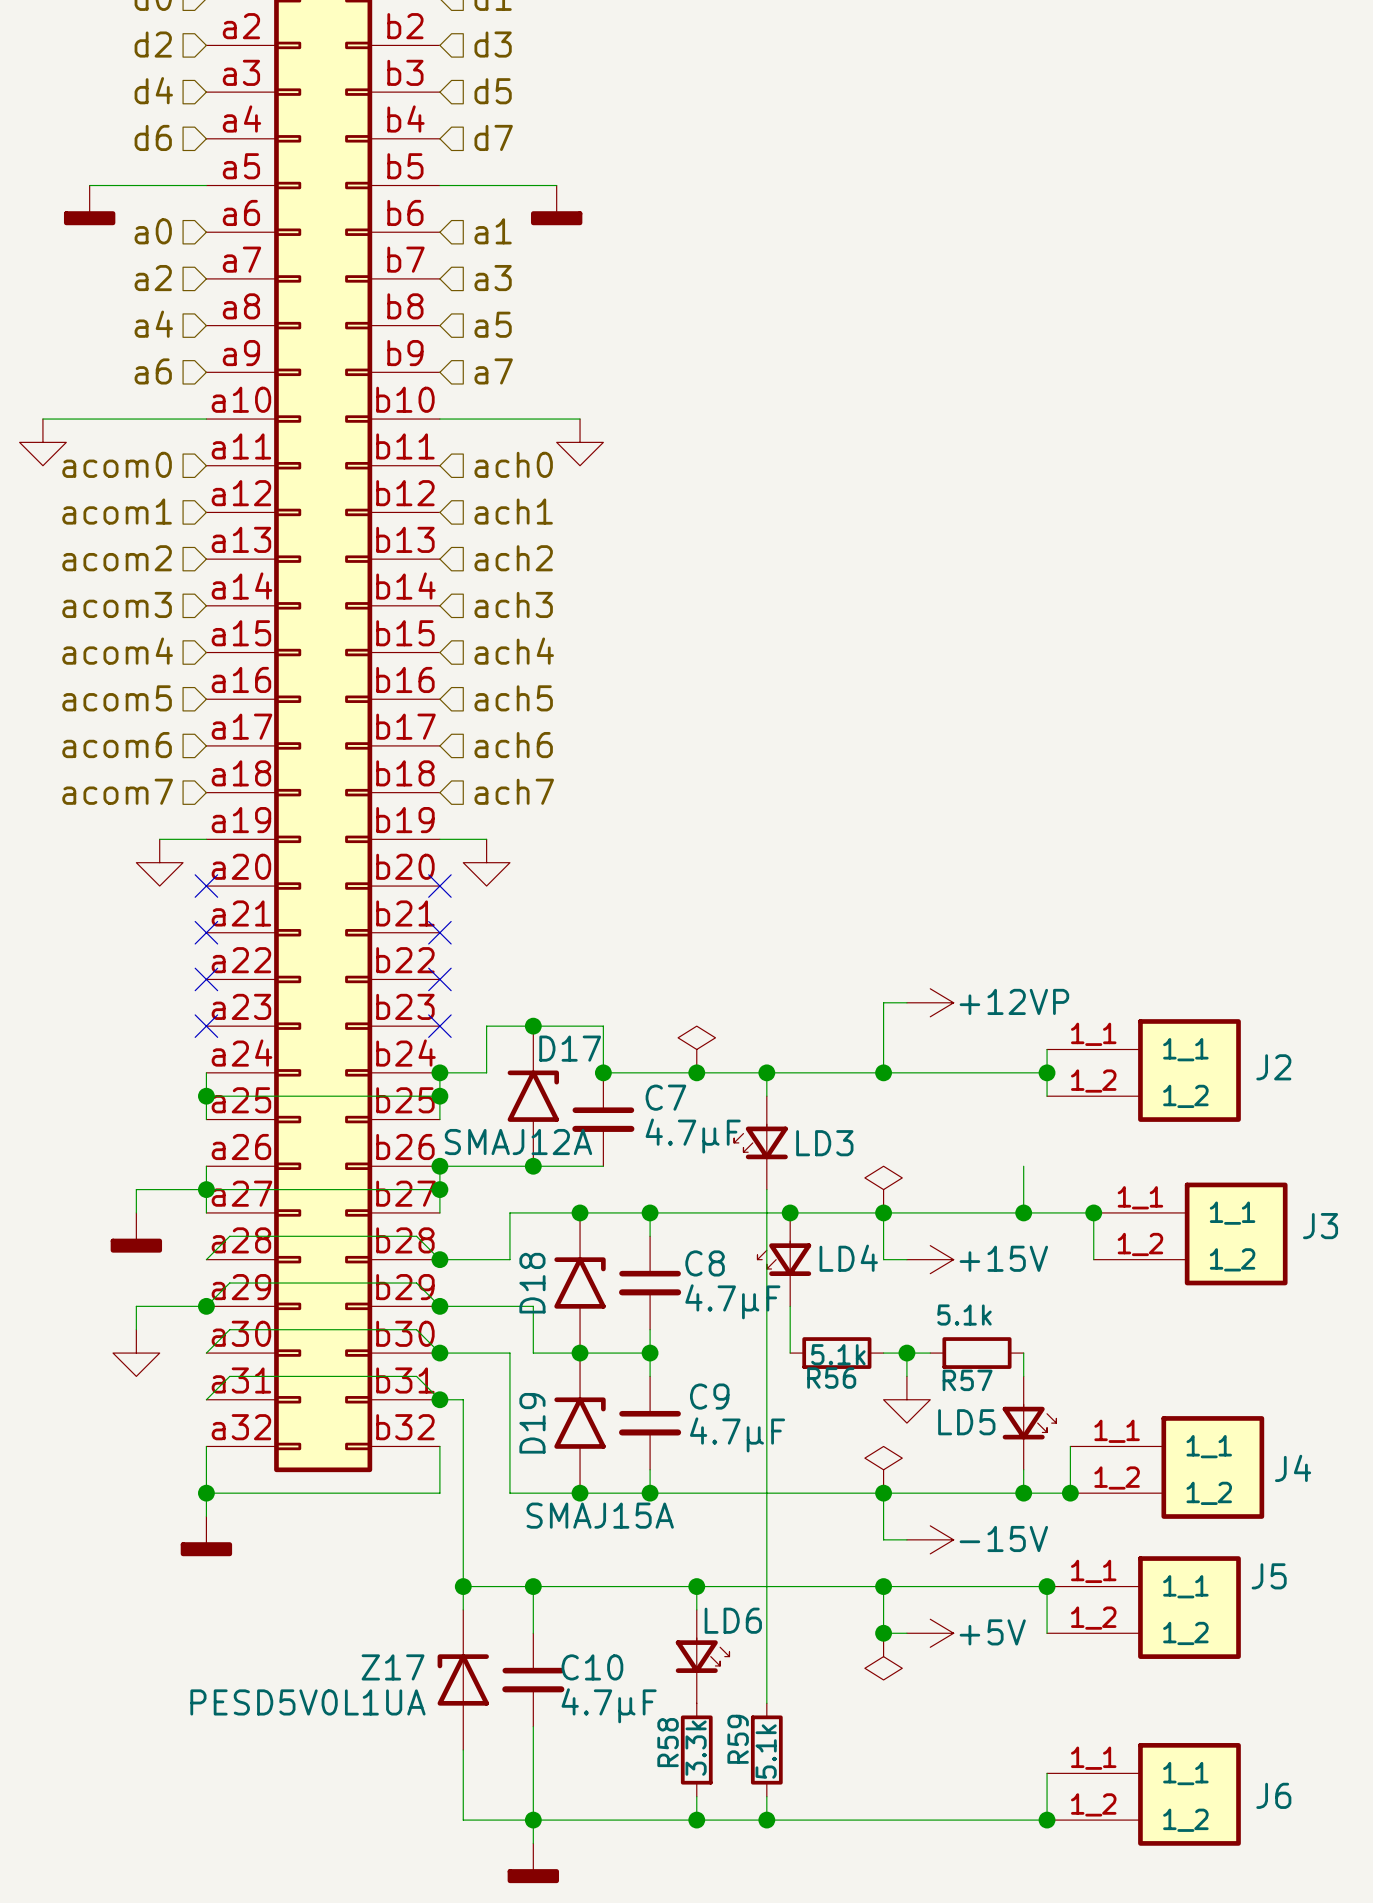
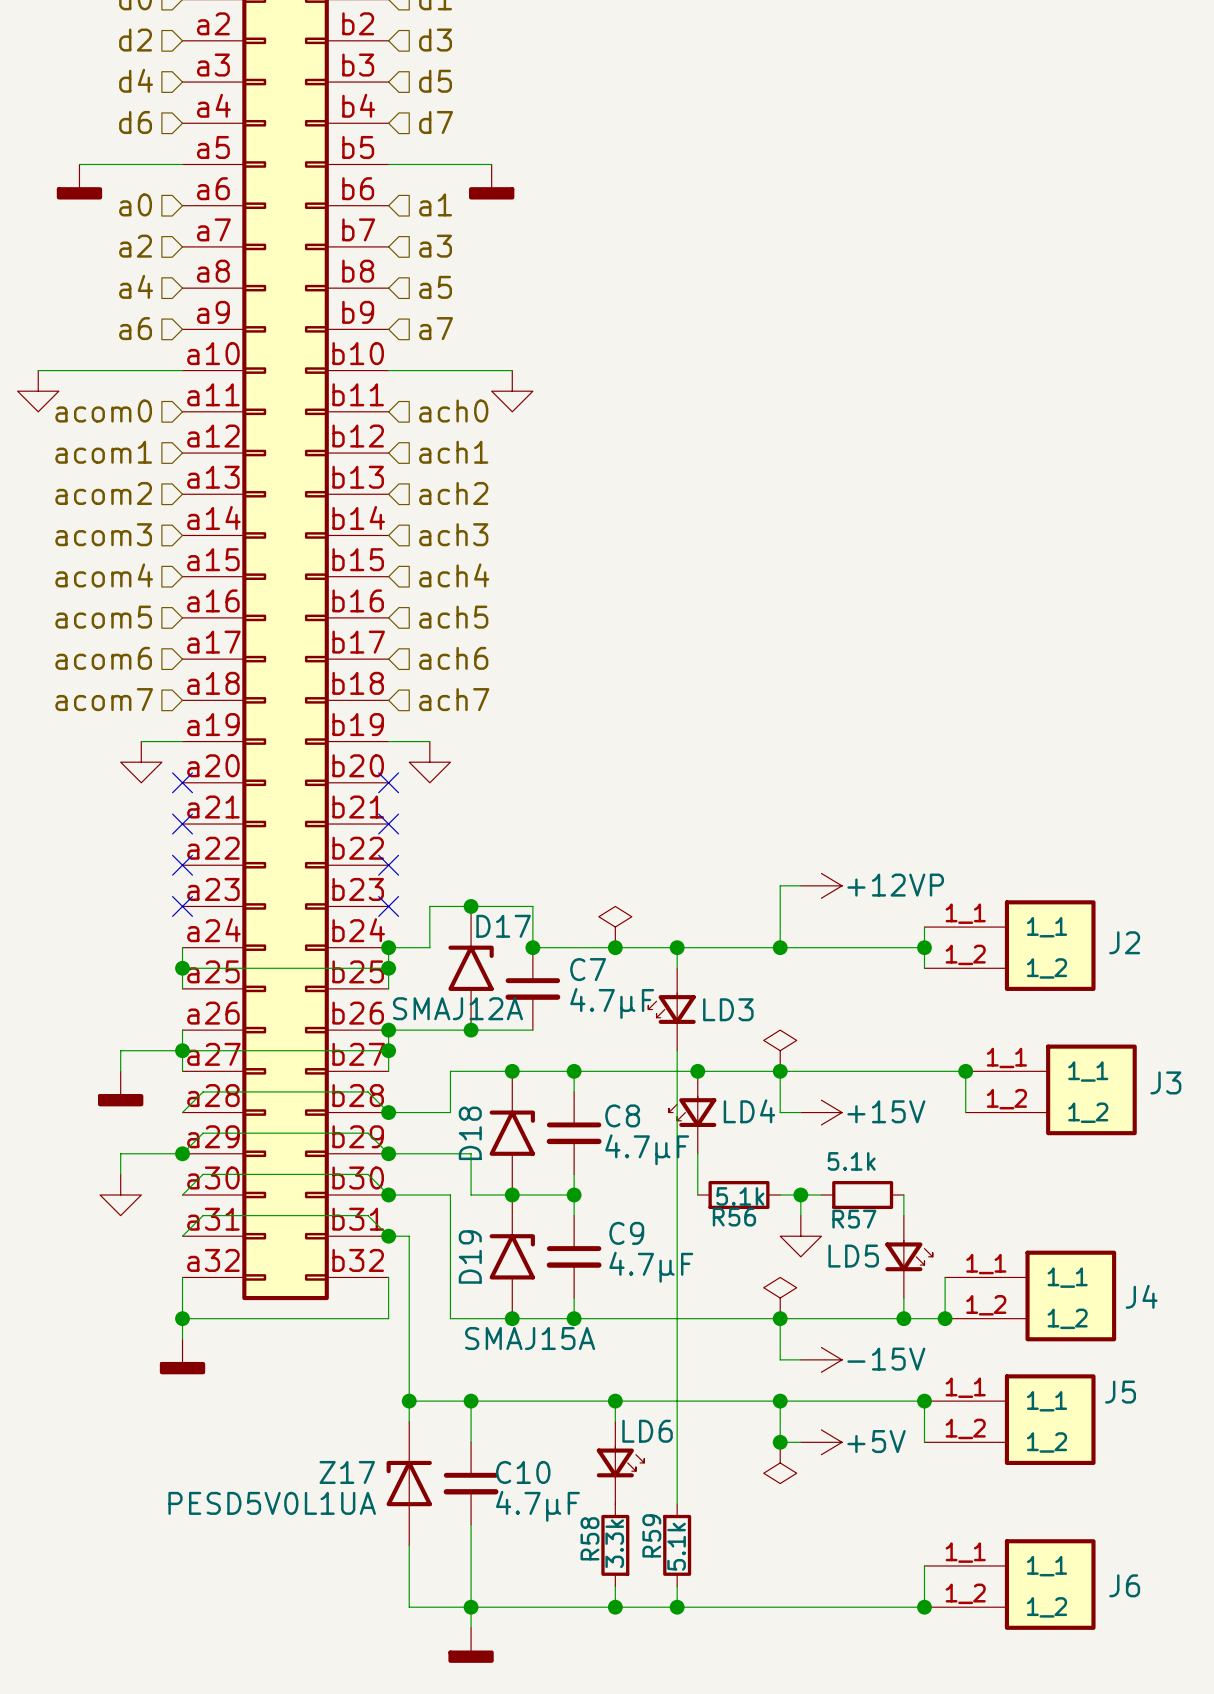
wire: (1023, 1166) (1023, 1212) -> none
junction: (1023, 1212) -> none

